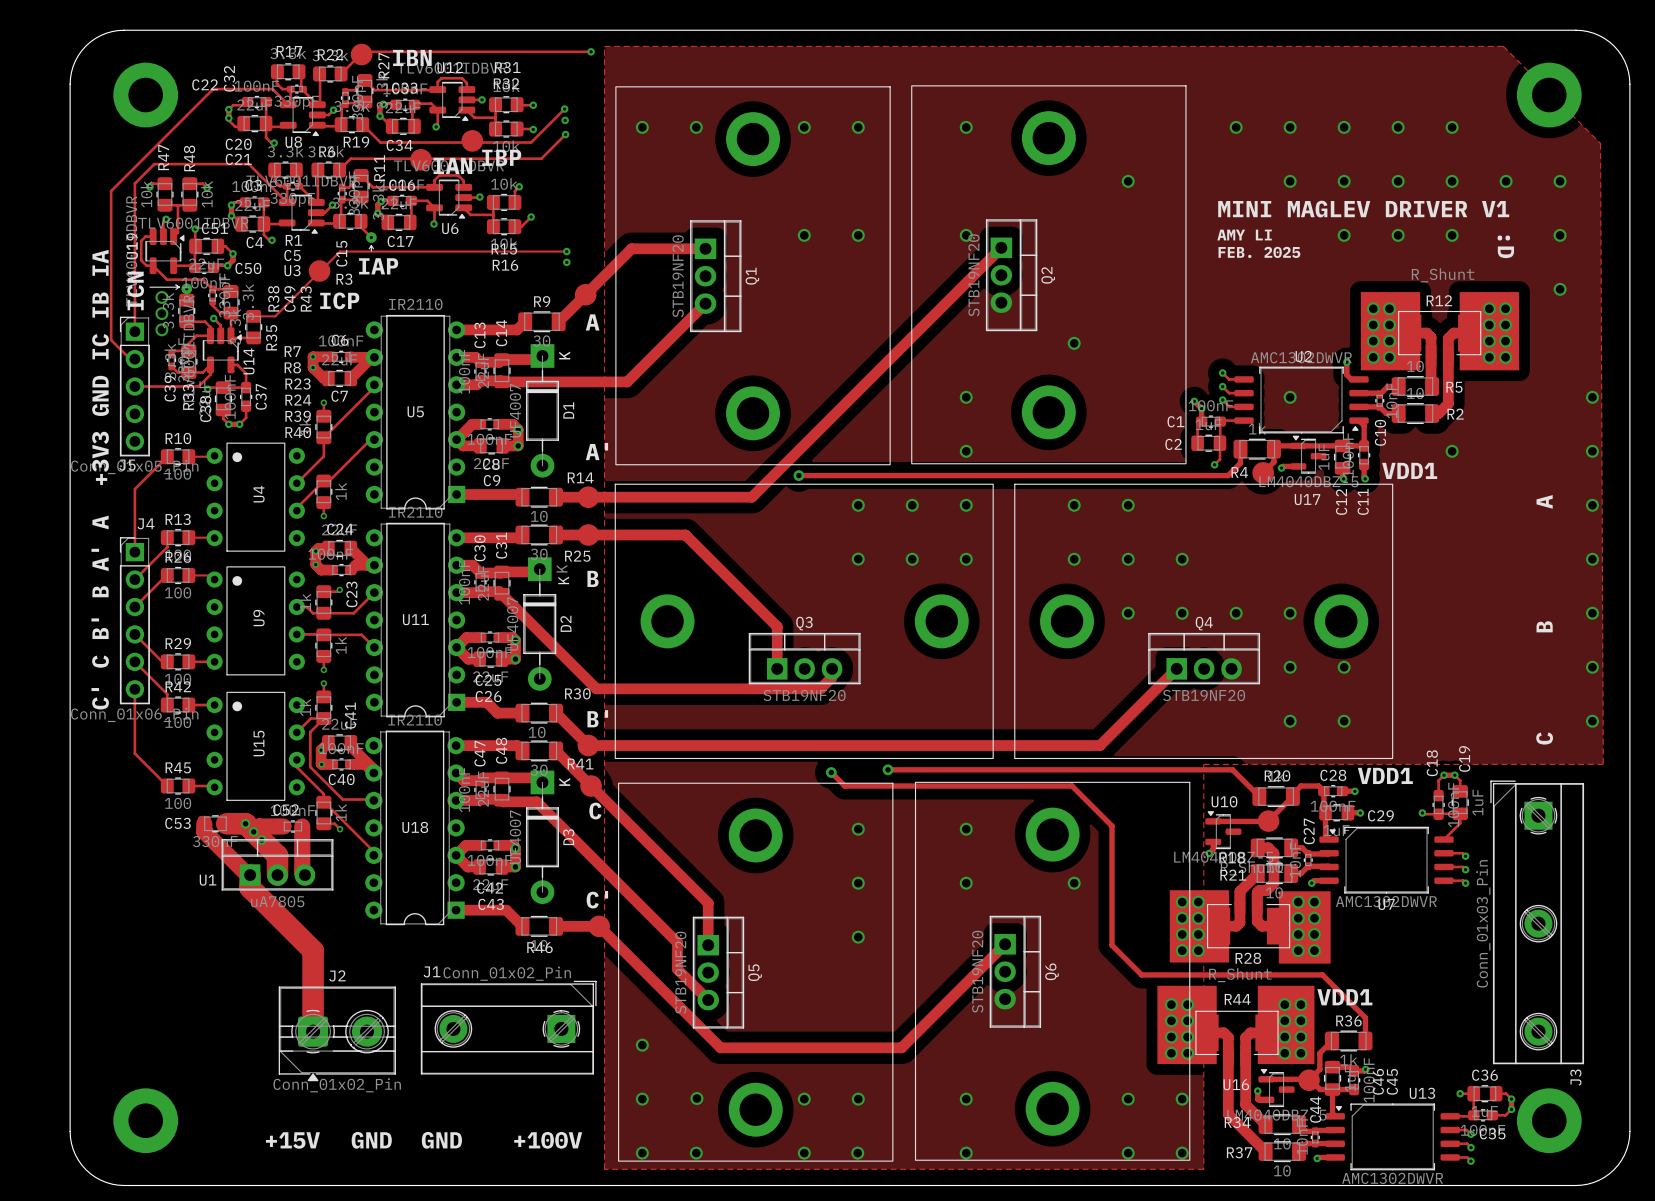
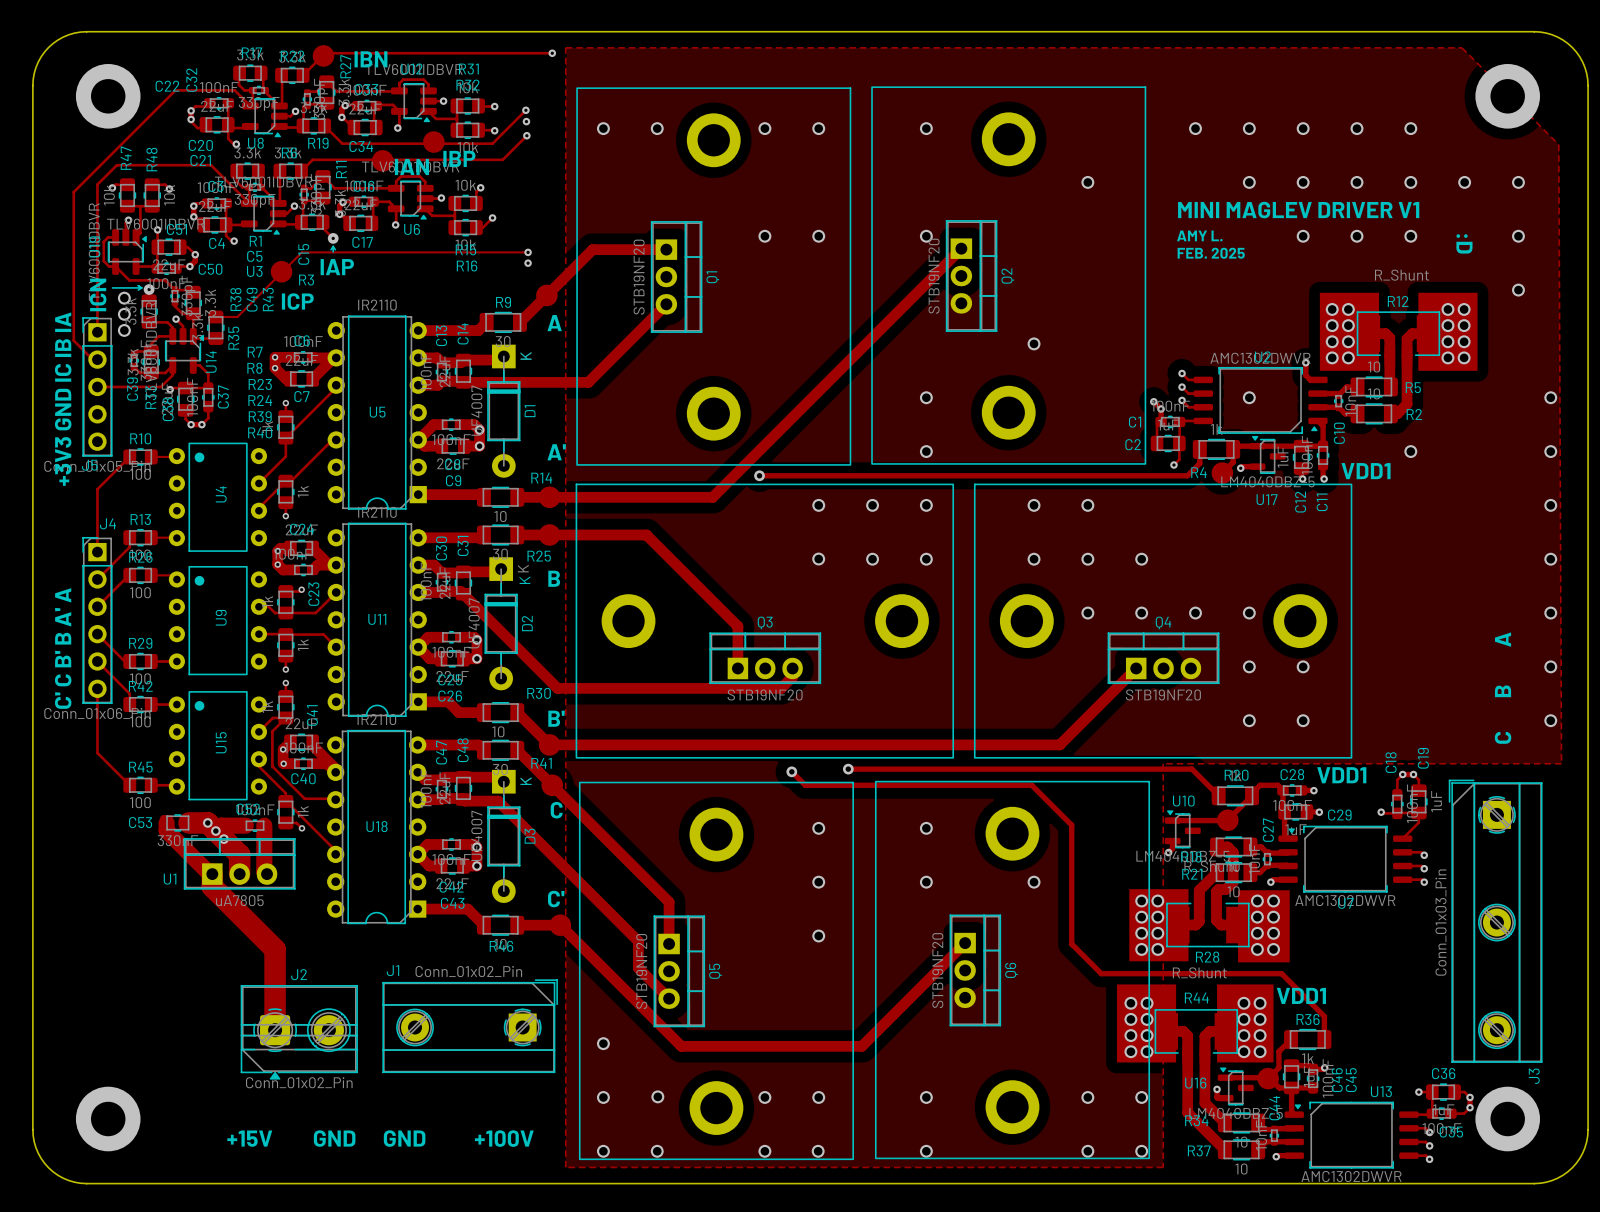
text: AMY LI (1244, 235) -> AMY L. (1199, 235)

